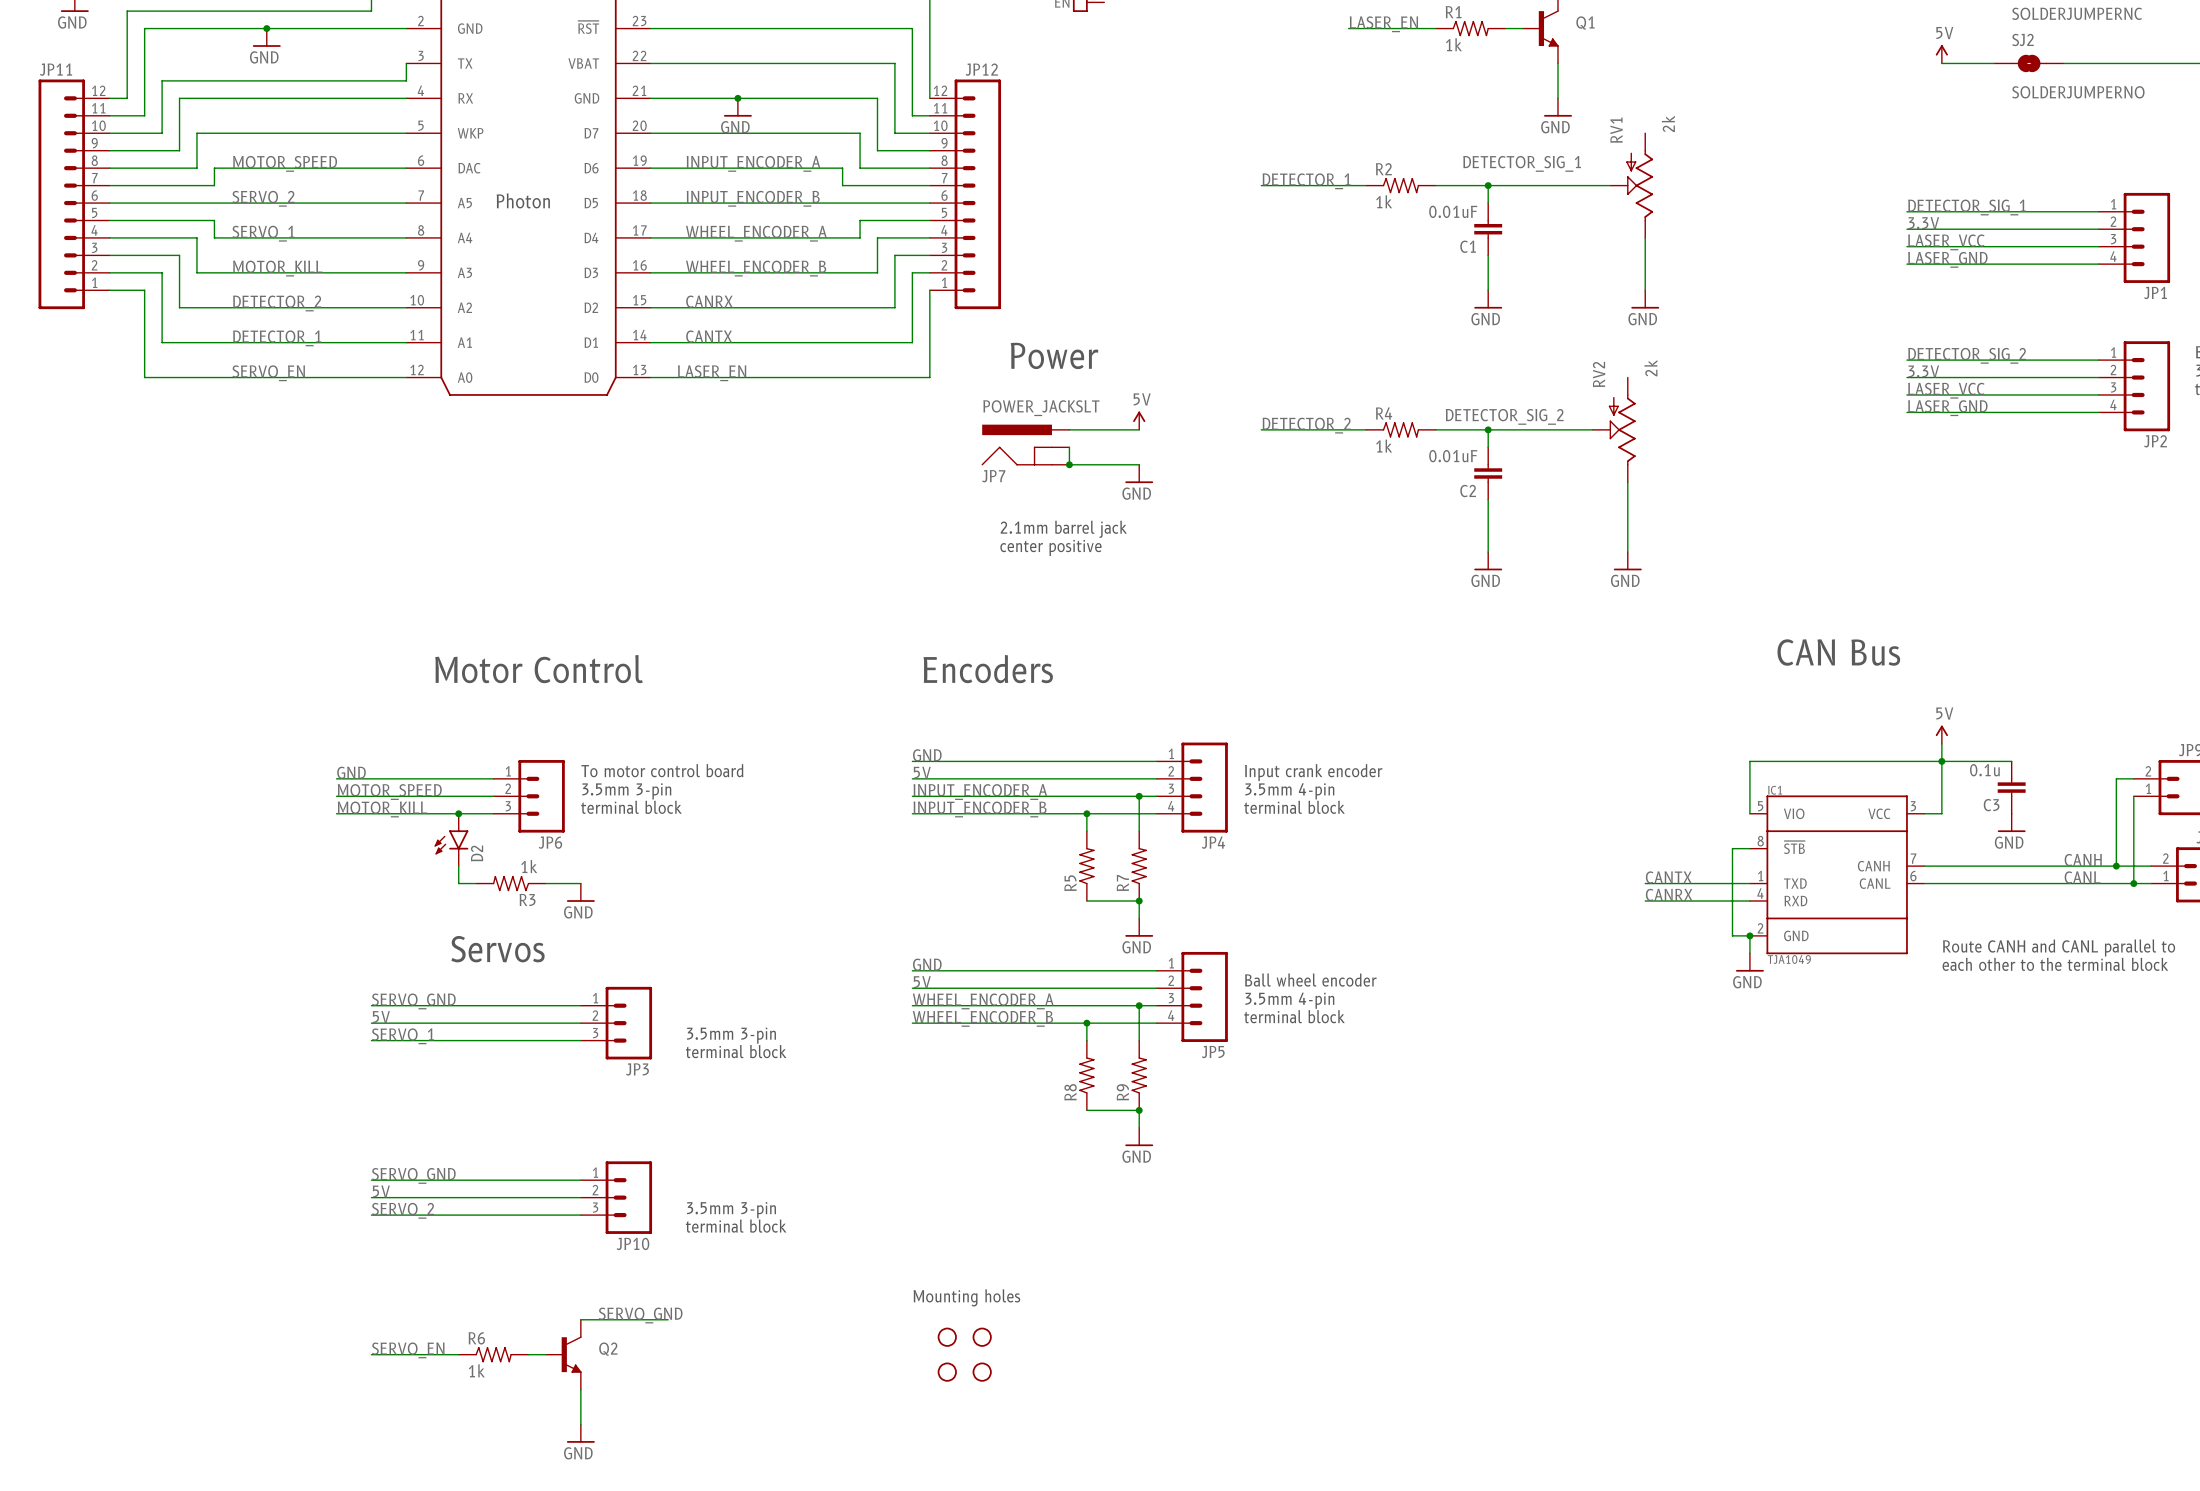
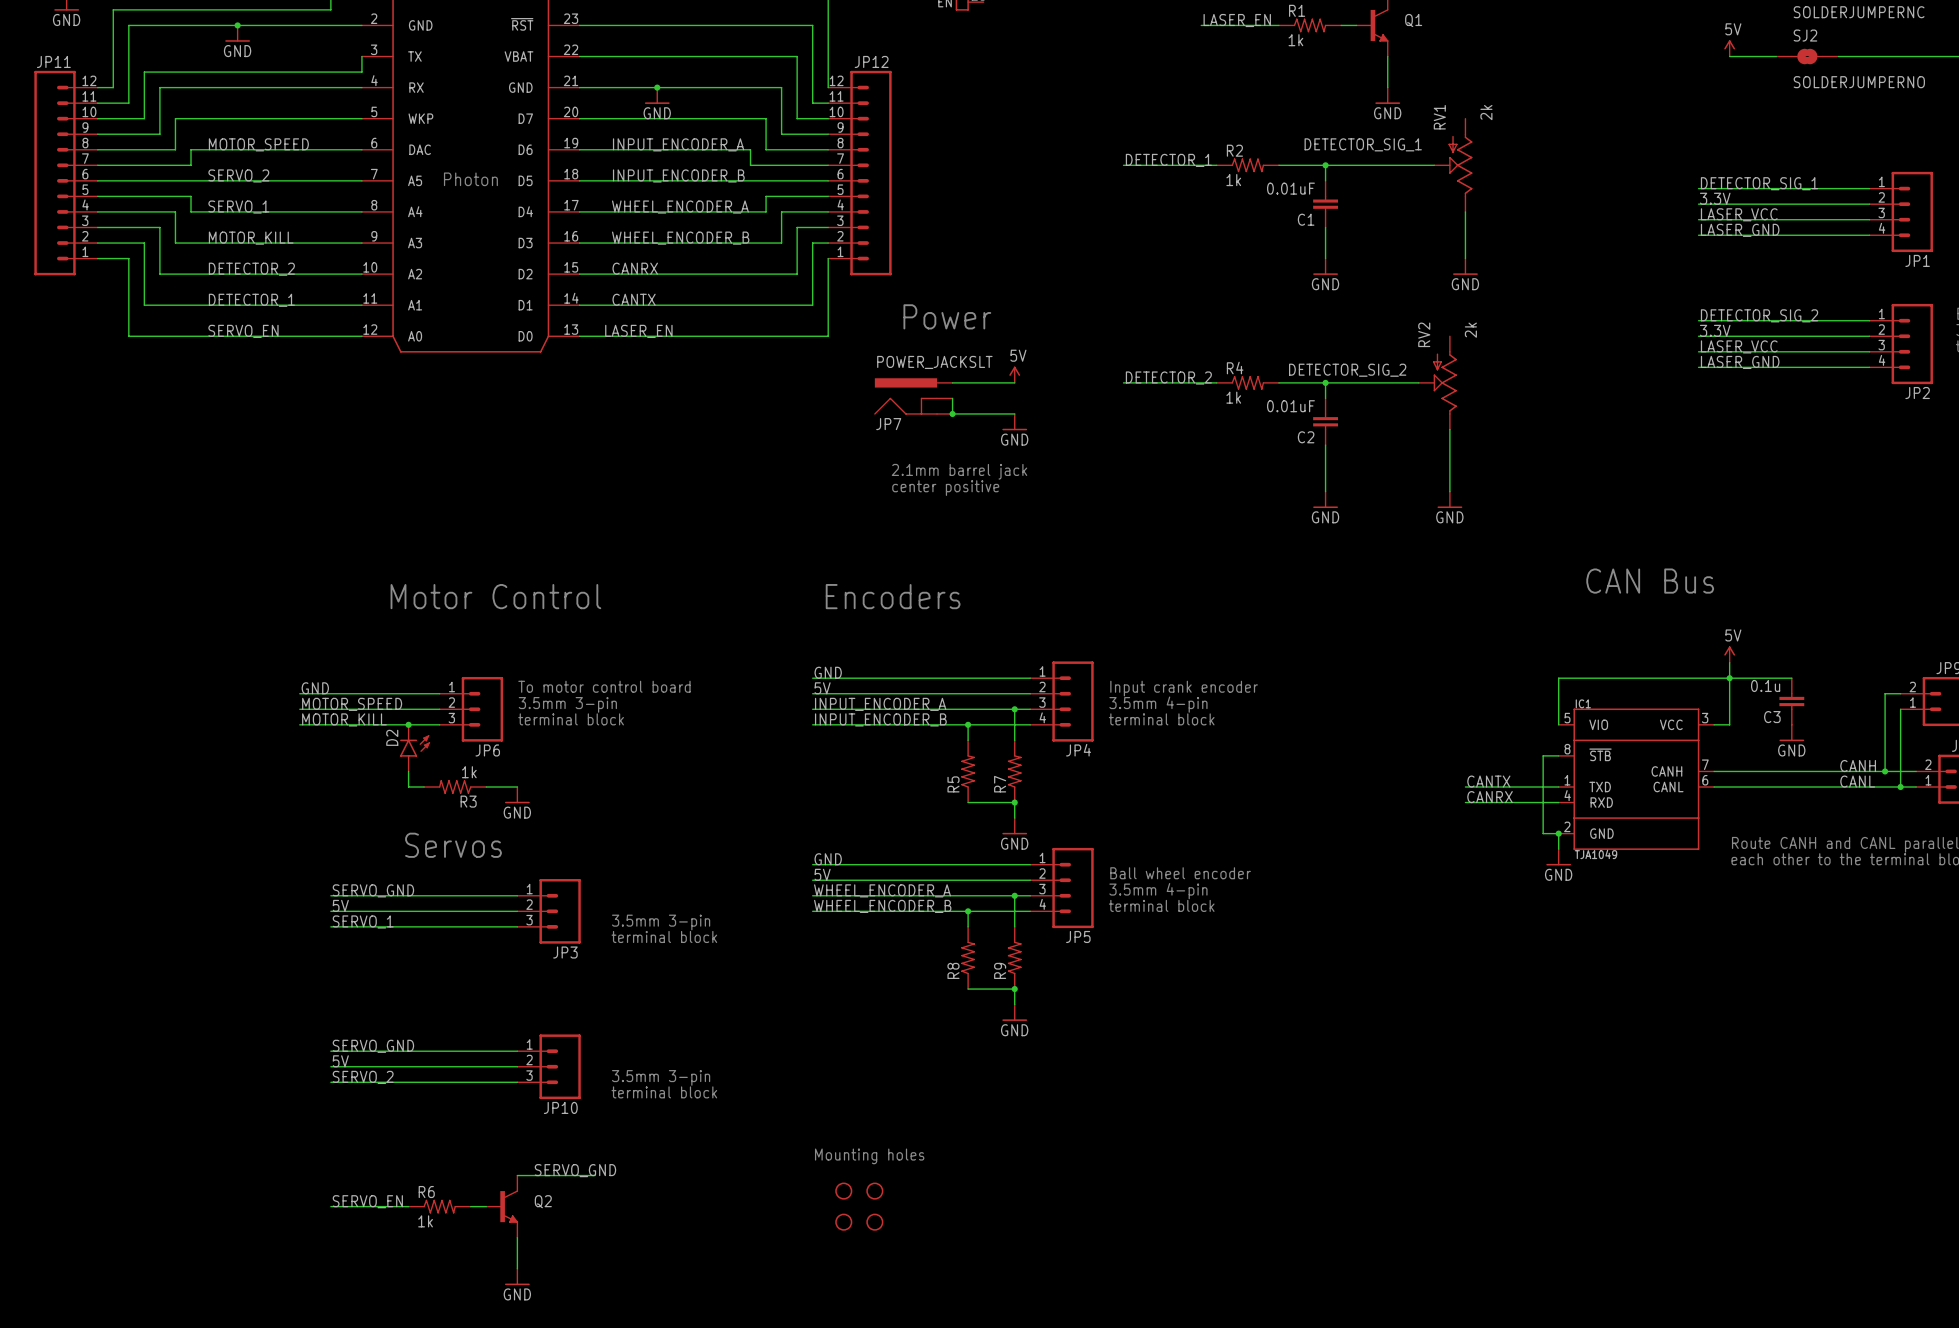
D2 rotation: 0° (451, 842) -> 180° (415, 745)

